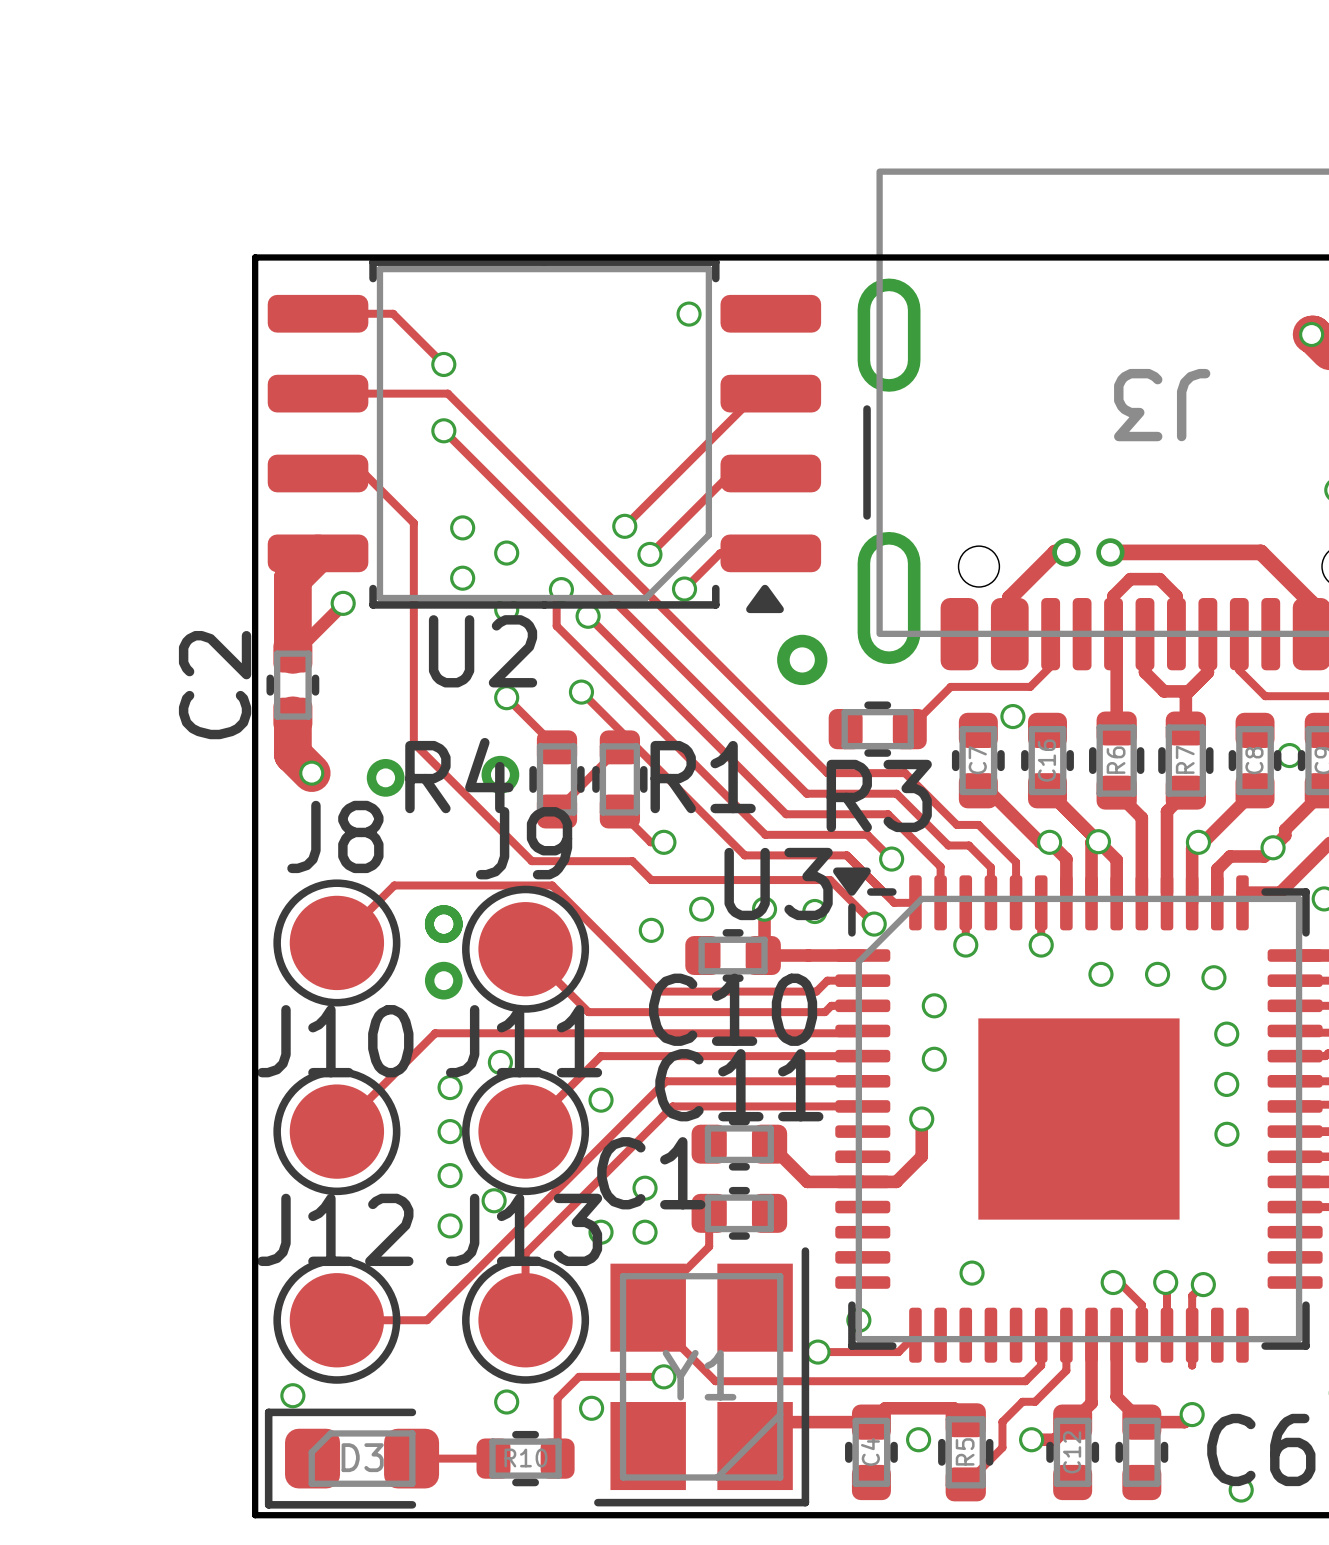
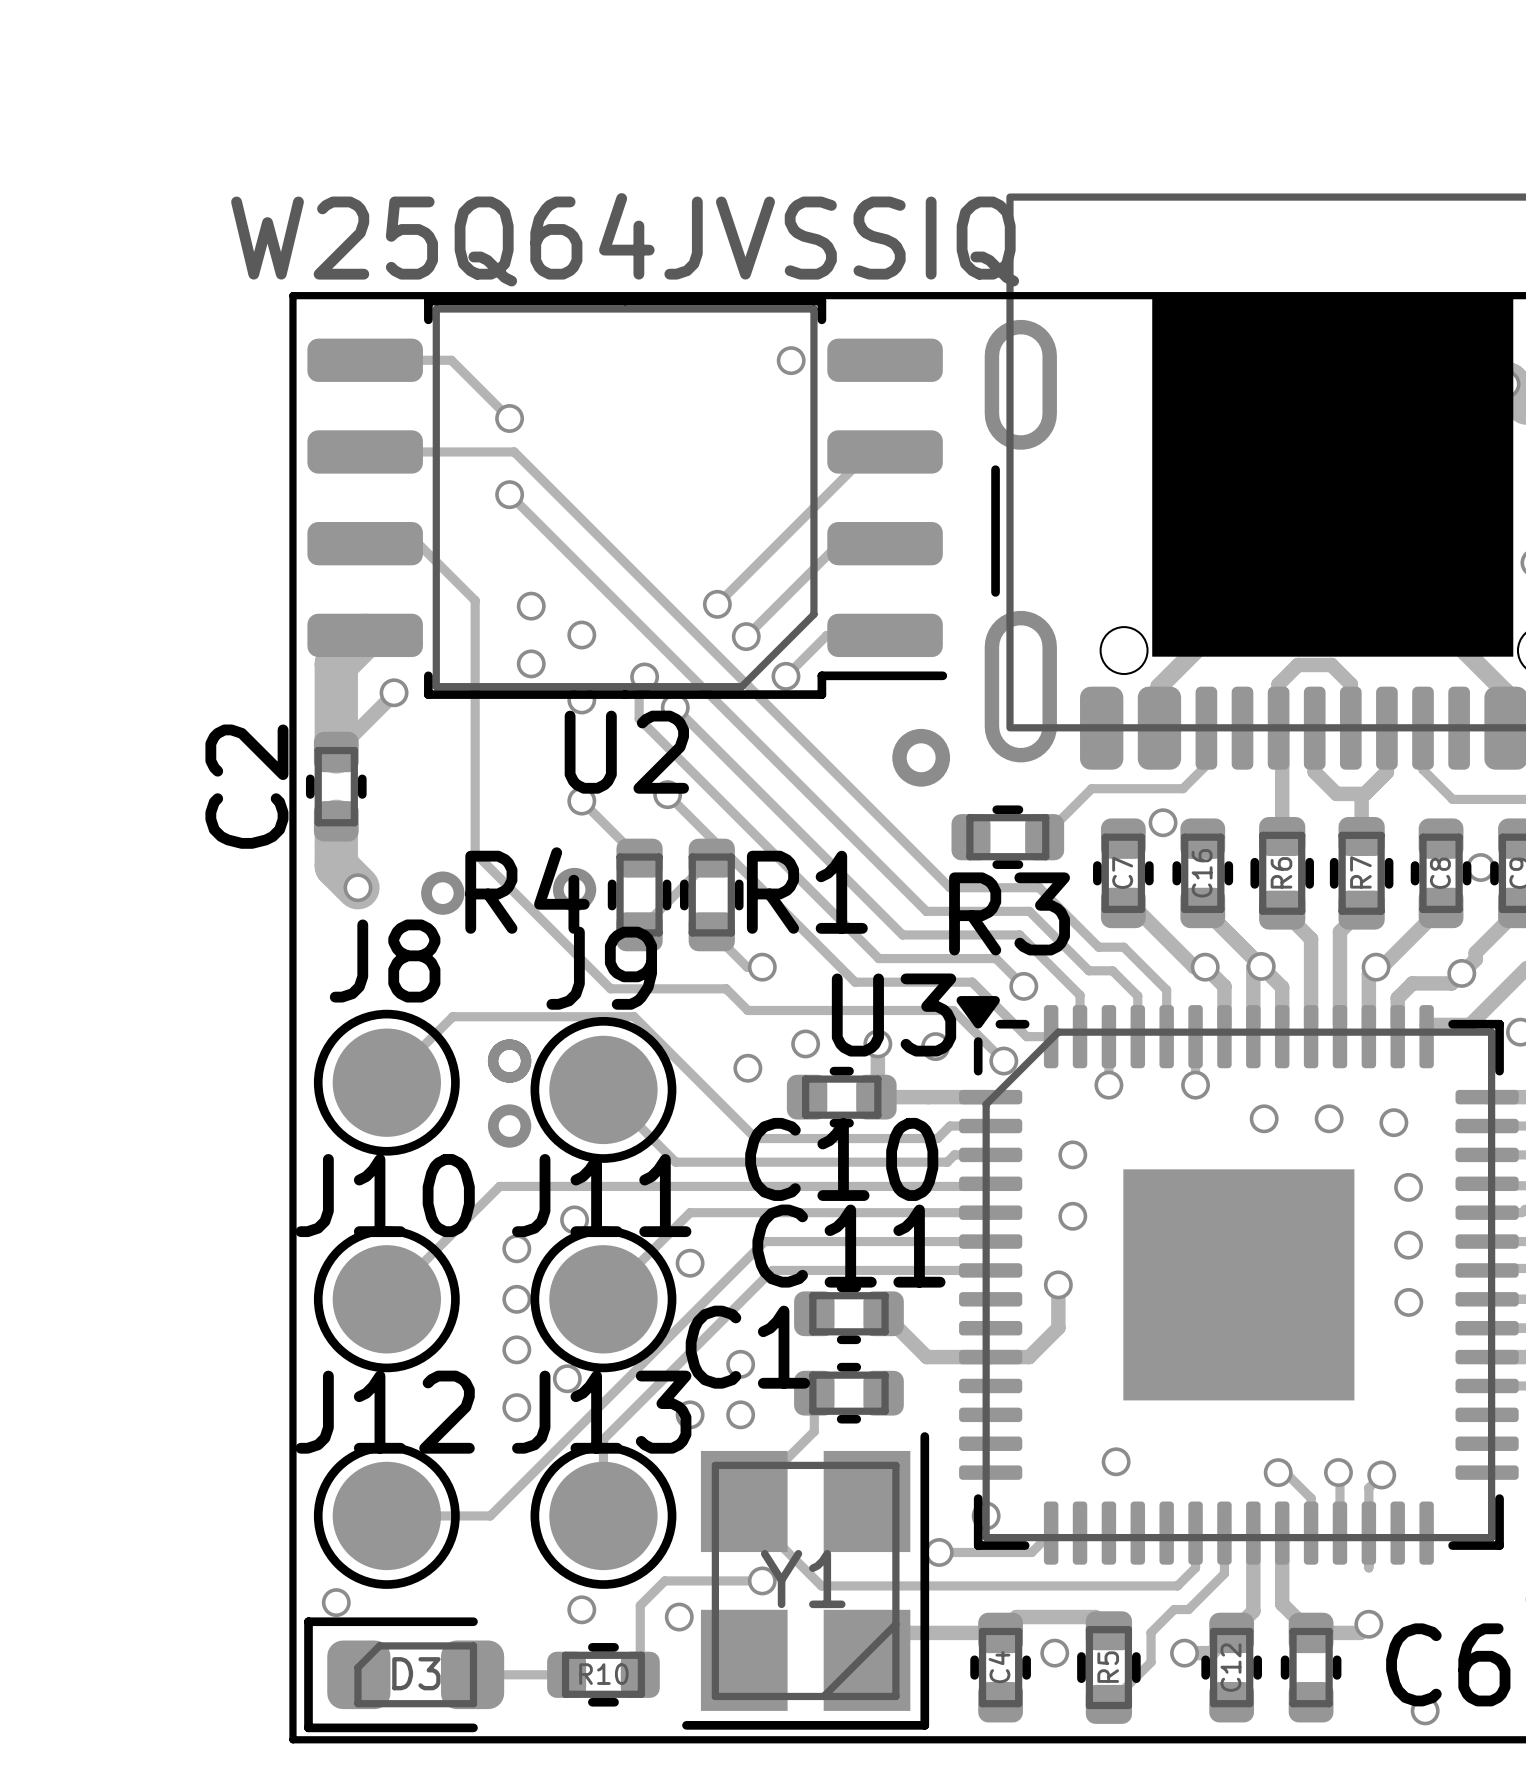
U2 value: none -> W25Q64JVSSIQ (625, 239)
drawing: none -> [1152, 295, 1514, 657]
U2 footprint: [267, 258, 822, 614] -> [307, 296, 948, 699]
U2 name position: U2 (483, 651) -> U2 (626, 752)

